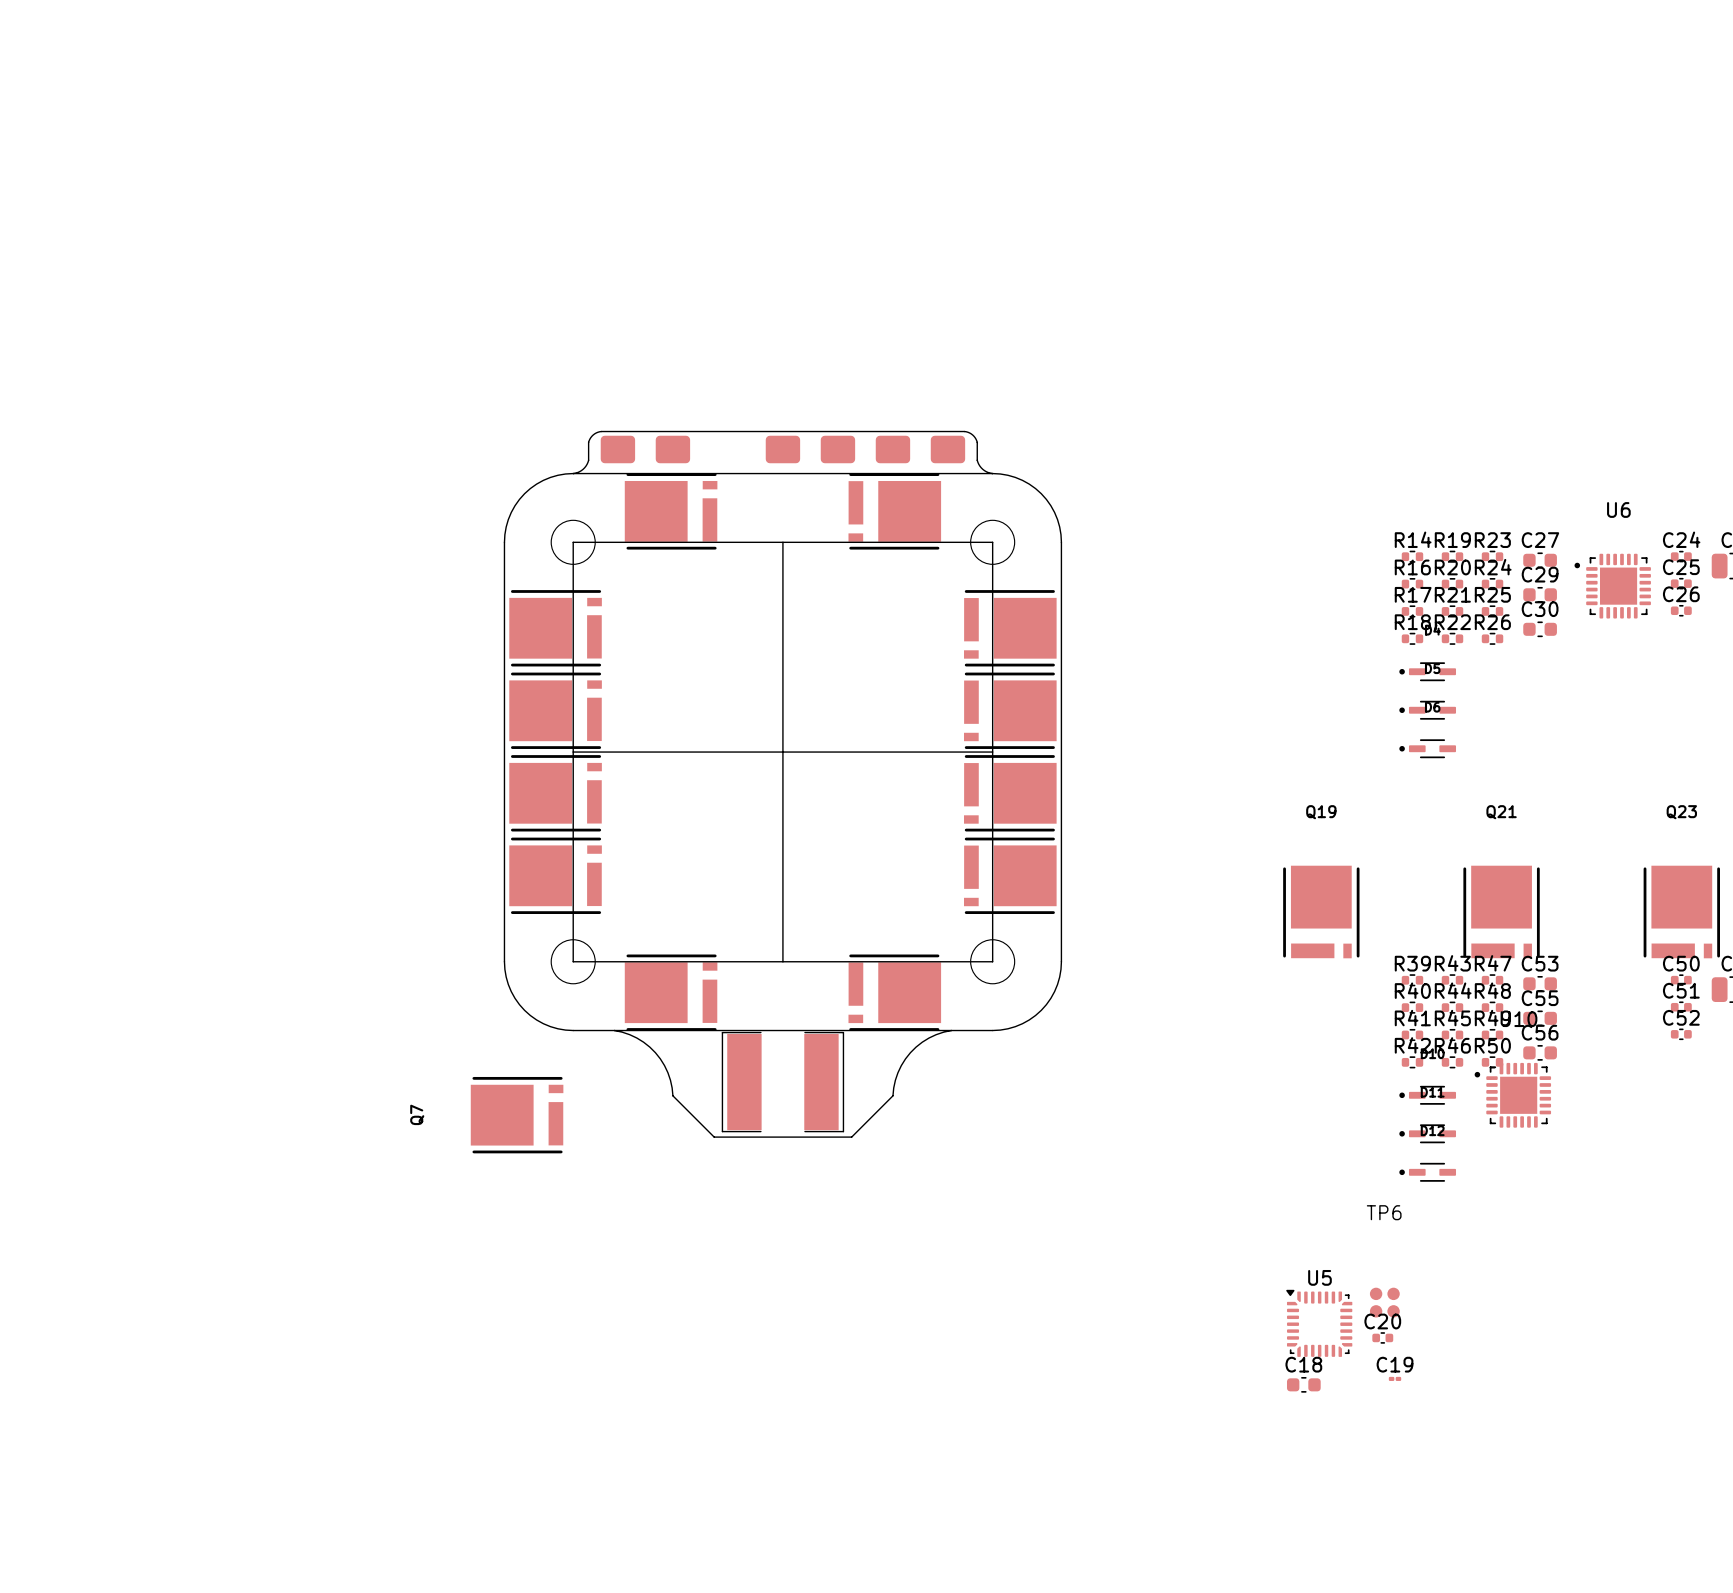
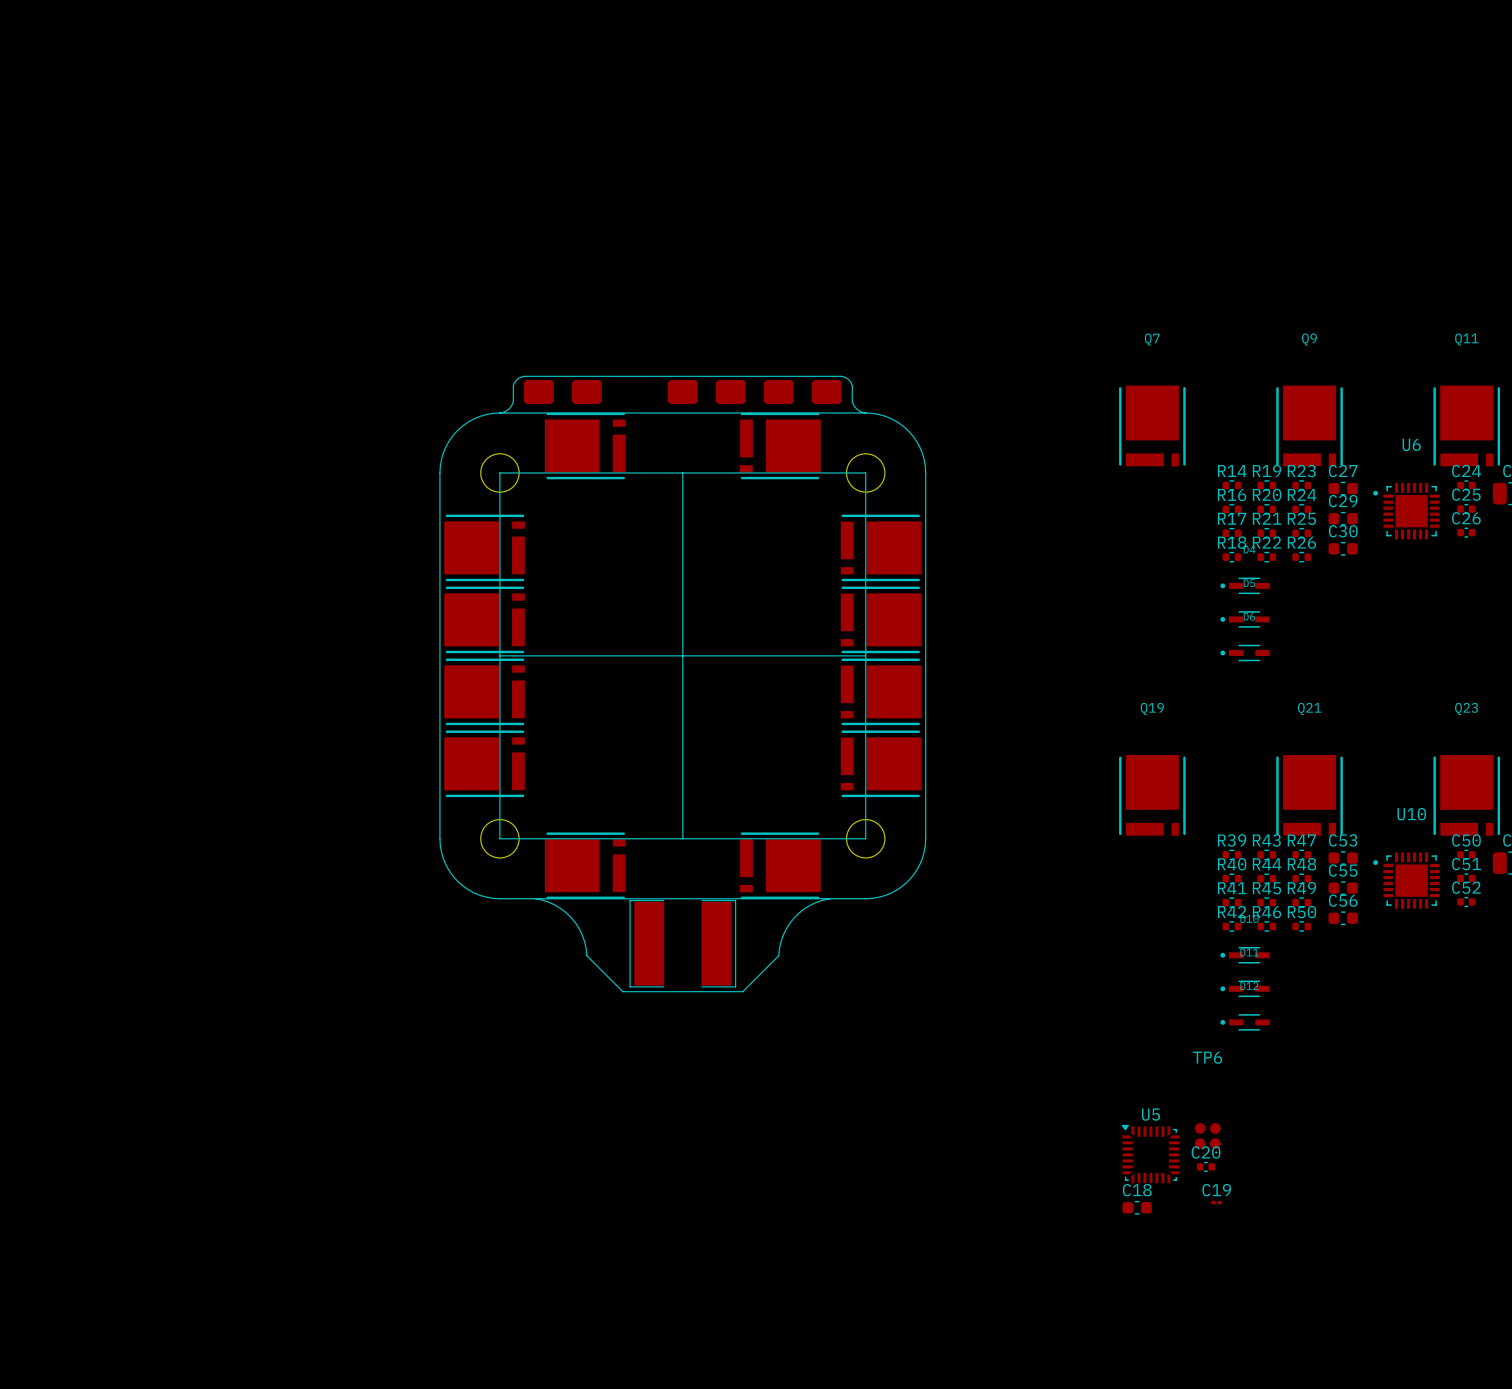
Q9: none -> (1309, 425)
Q11: none -> (1466, 425)
U10 position: (1512, 1095) -> (1406, 880)
Q7 rotation: 0° (517, 1115) -> 90° clockwise (1152, 425)
Q7 position: (517, 1115) -> (1152, 425)

